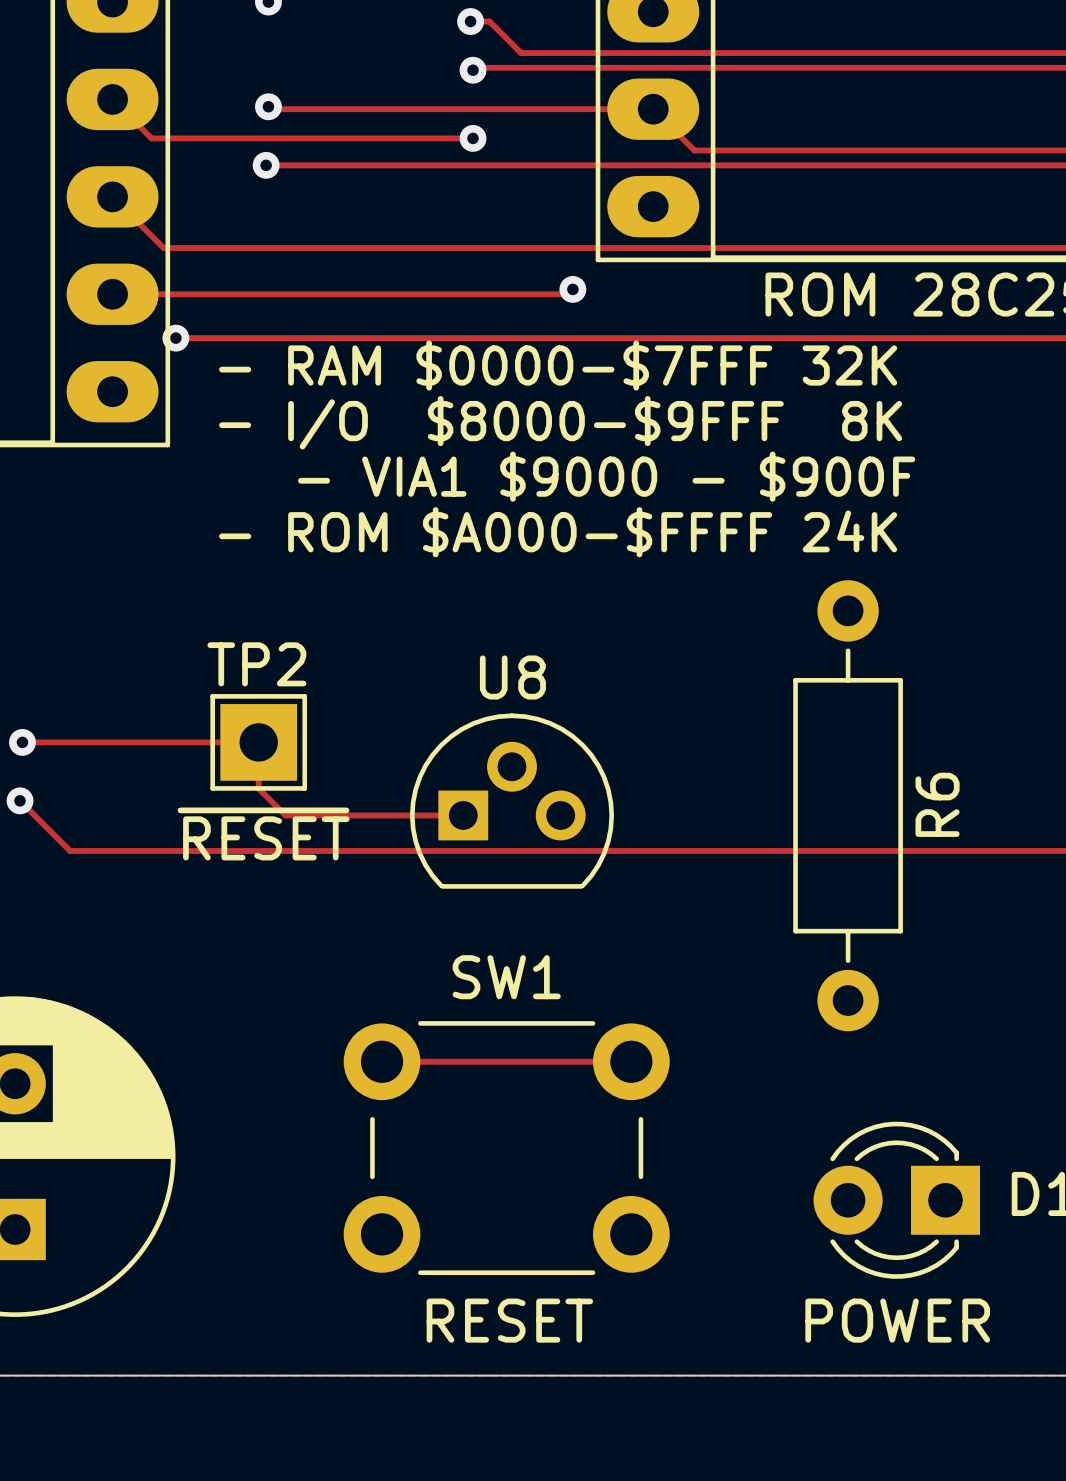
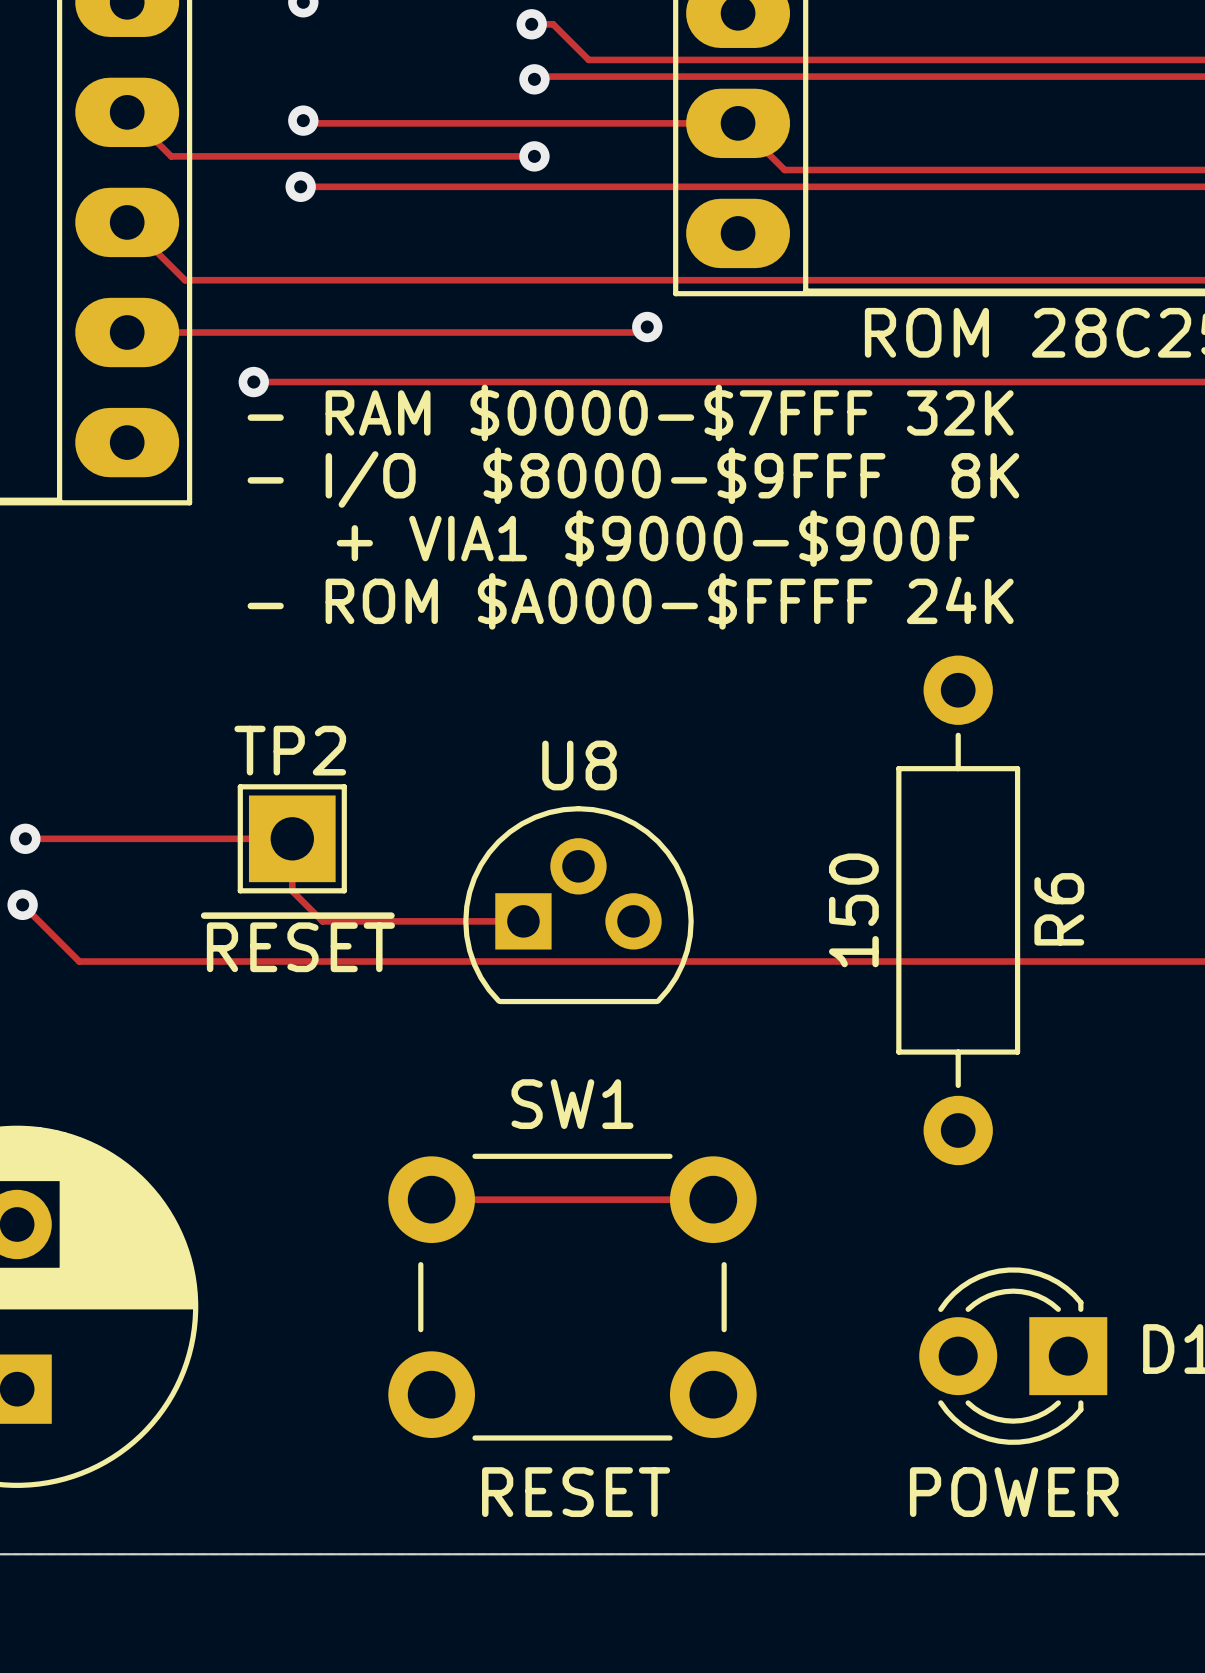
track: (175, 338) (224, 338) -> none
via position: (175, 338) -> (253, 382)
text: - VIA1 $9000 - $900F (606, 476) -> + VIA1 $9000-$900F (655, 538)
R6 value: none -> 150 (853, 910)

